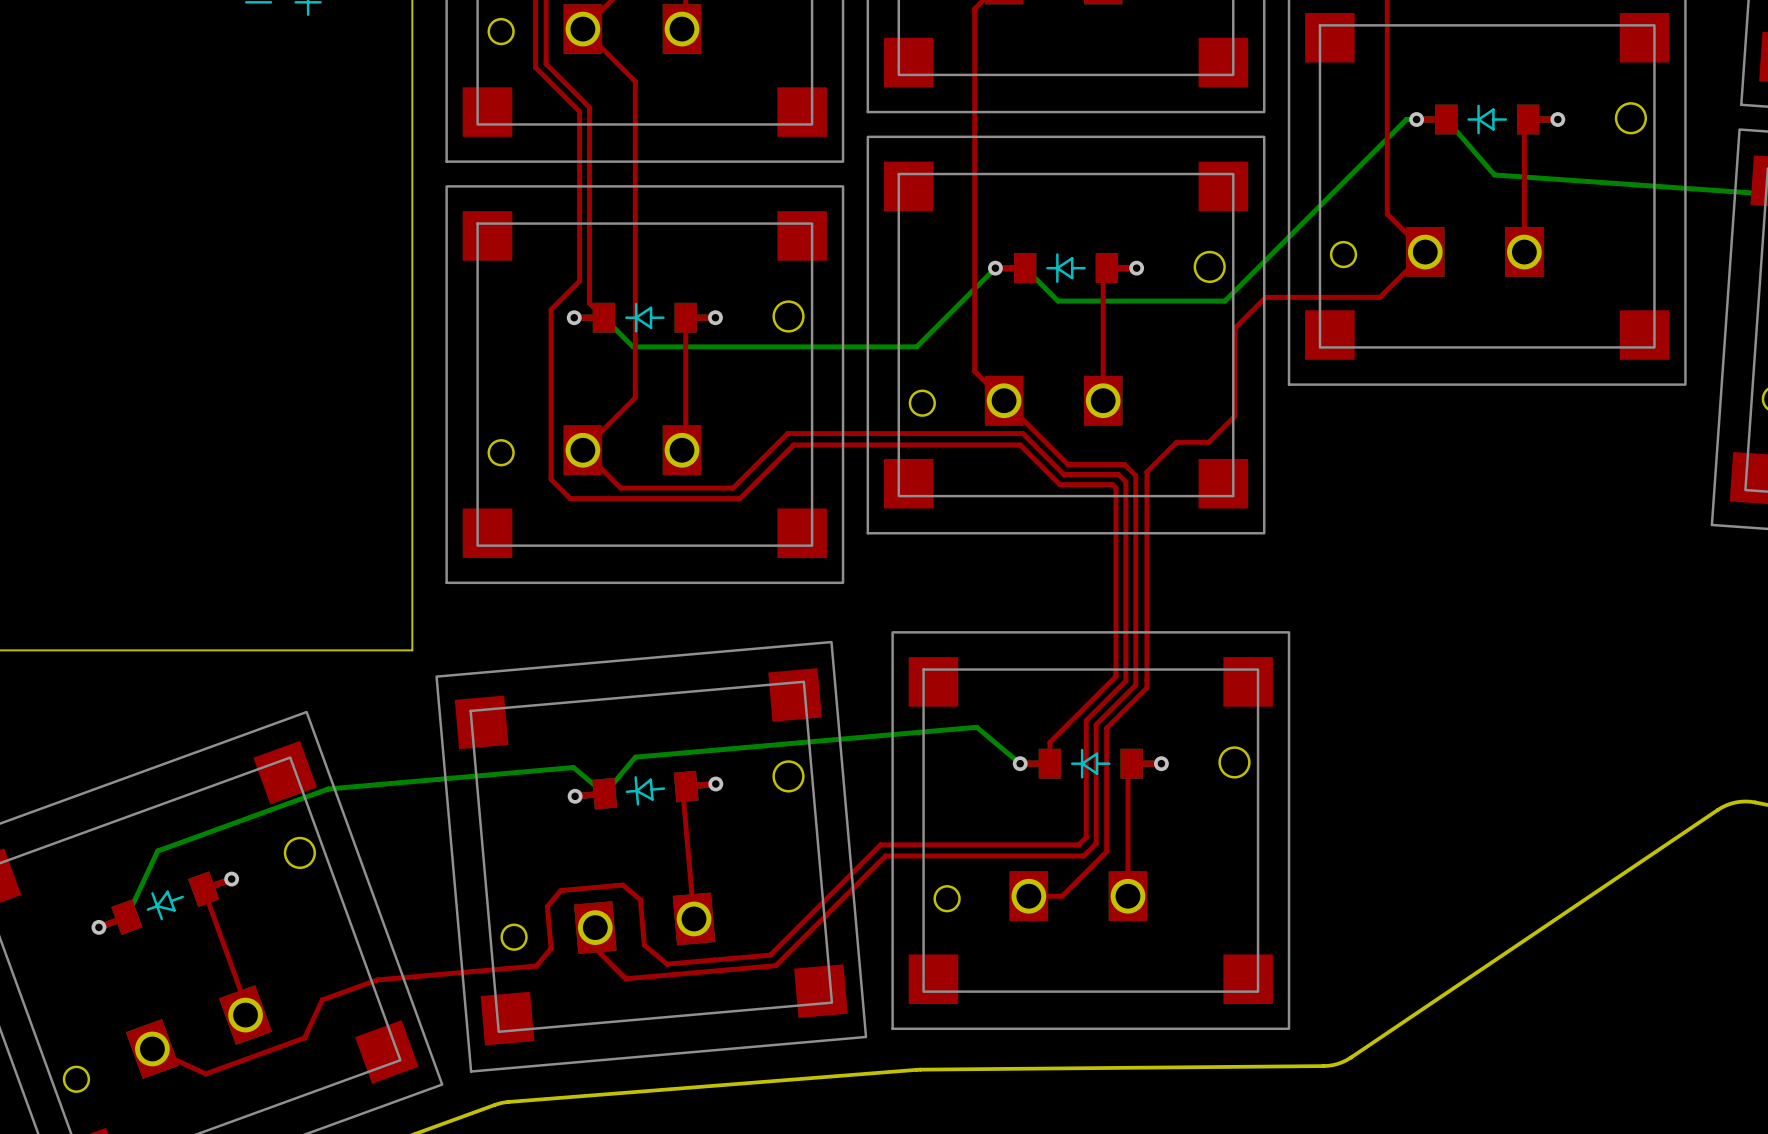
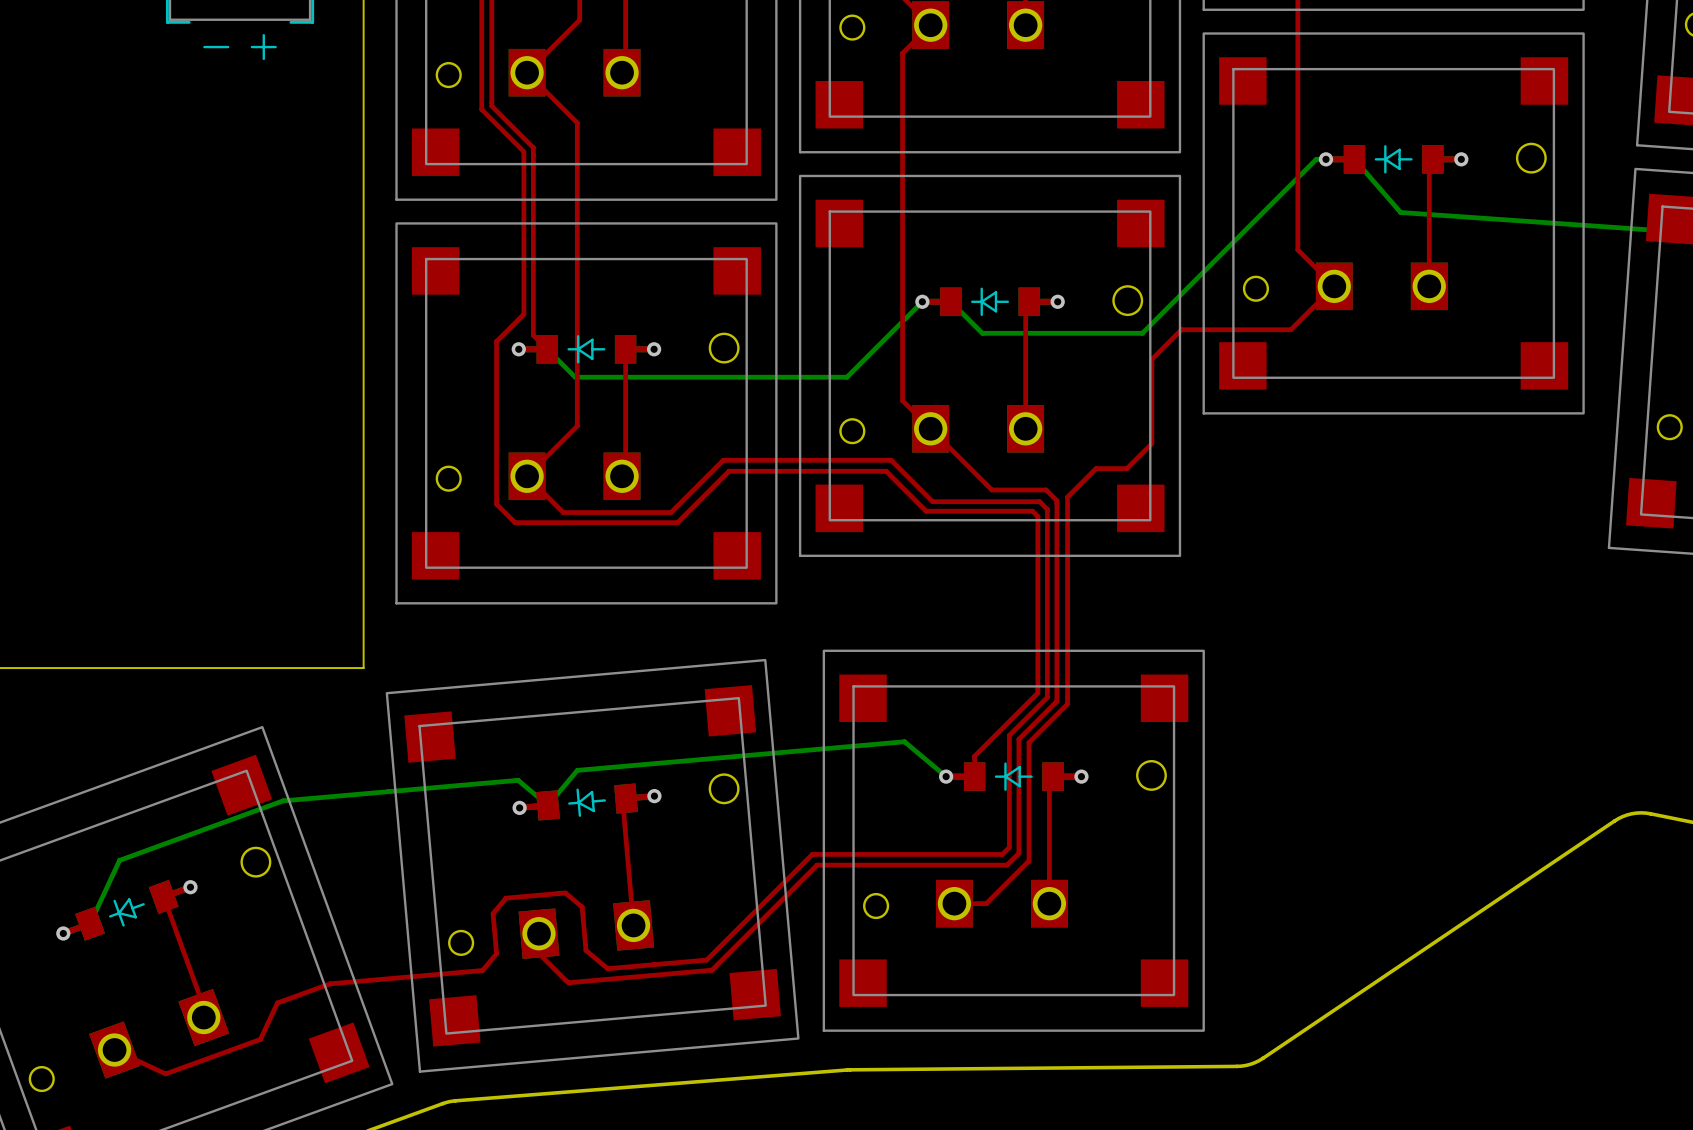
top track: (962, 433) (1022, 433) (1063, 474) (1118, 474) (1125, 481) (1125, 484) -> (891, 460) (932, 501) (1039, 501) (1047, 509)
top track: (957, 444) (1020, 444) (1059, 484) (1112, 484) (1115, 488) (1115, 492) -> (886, 471) (926, 511) (1032, 511) (1037, 516)

